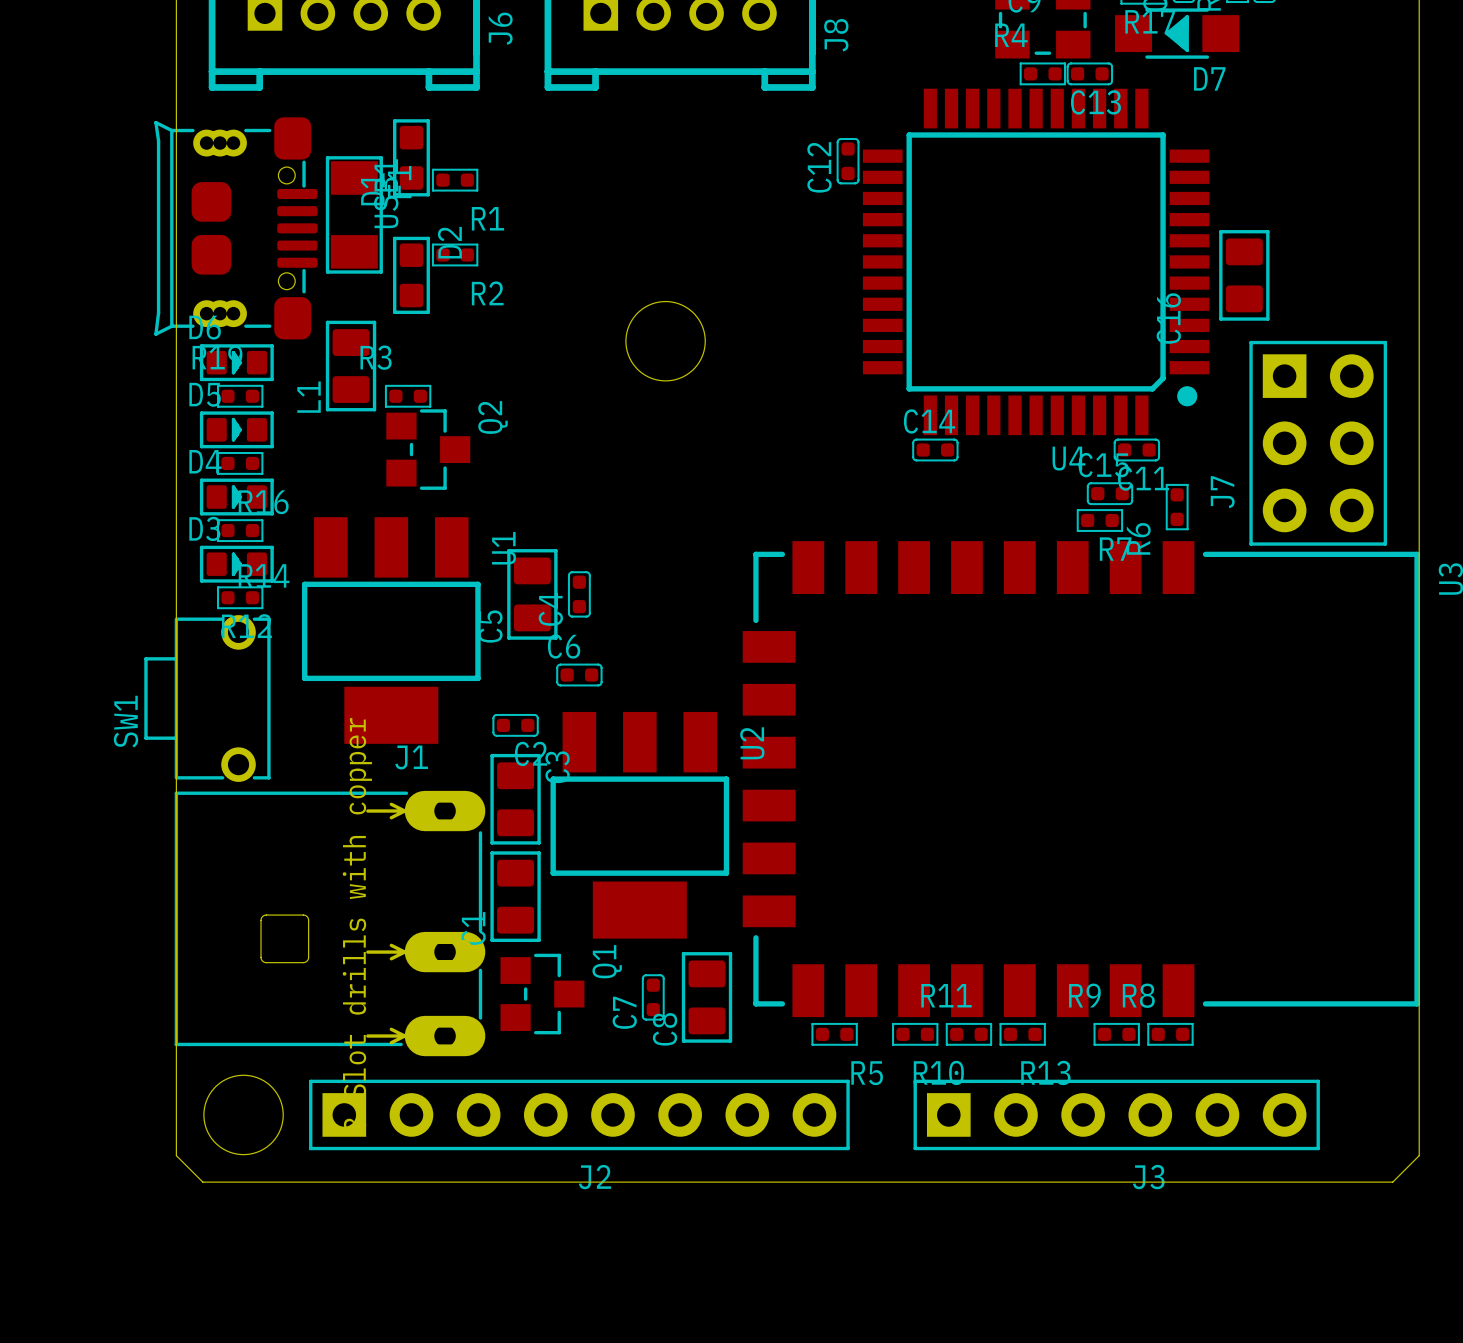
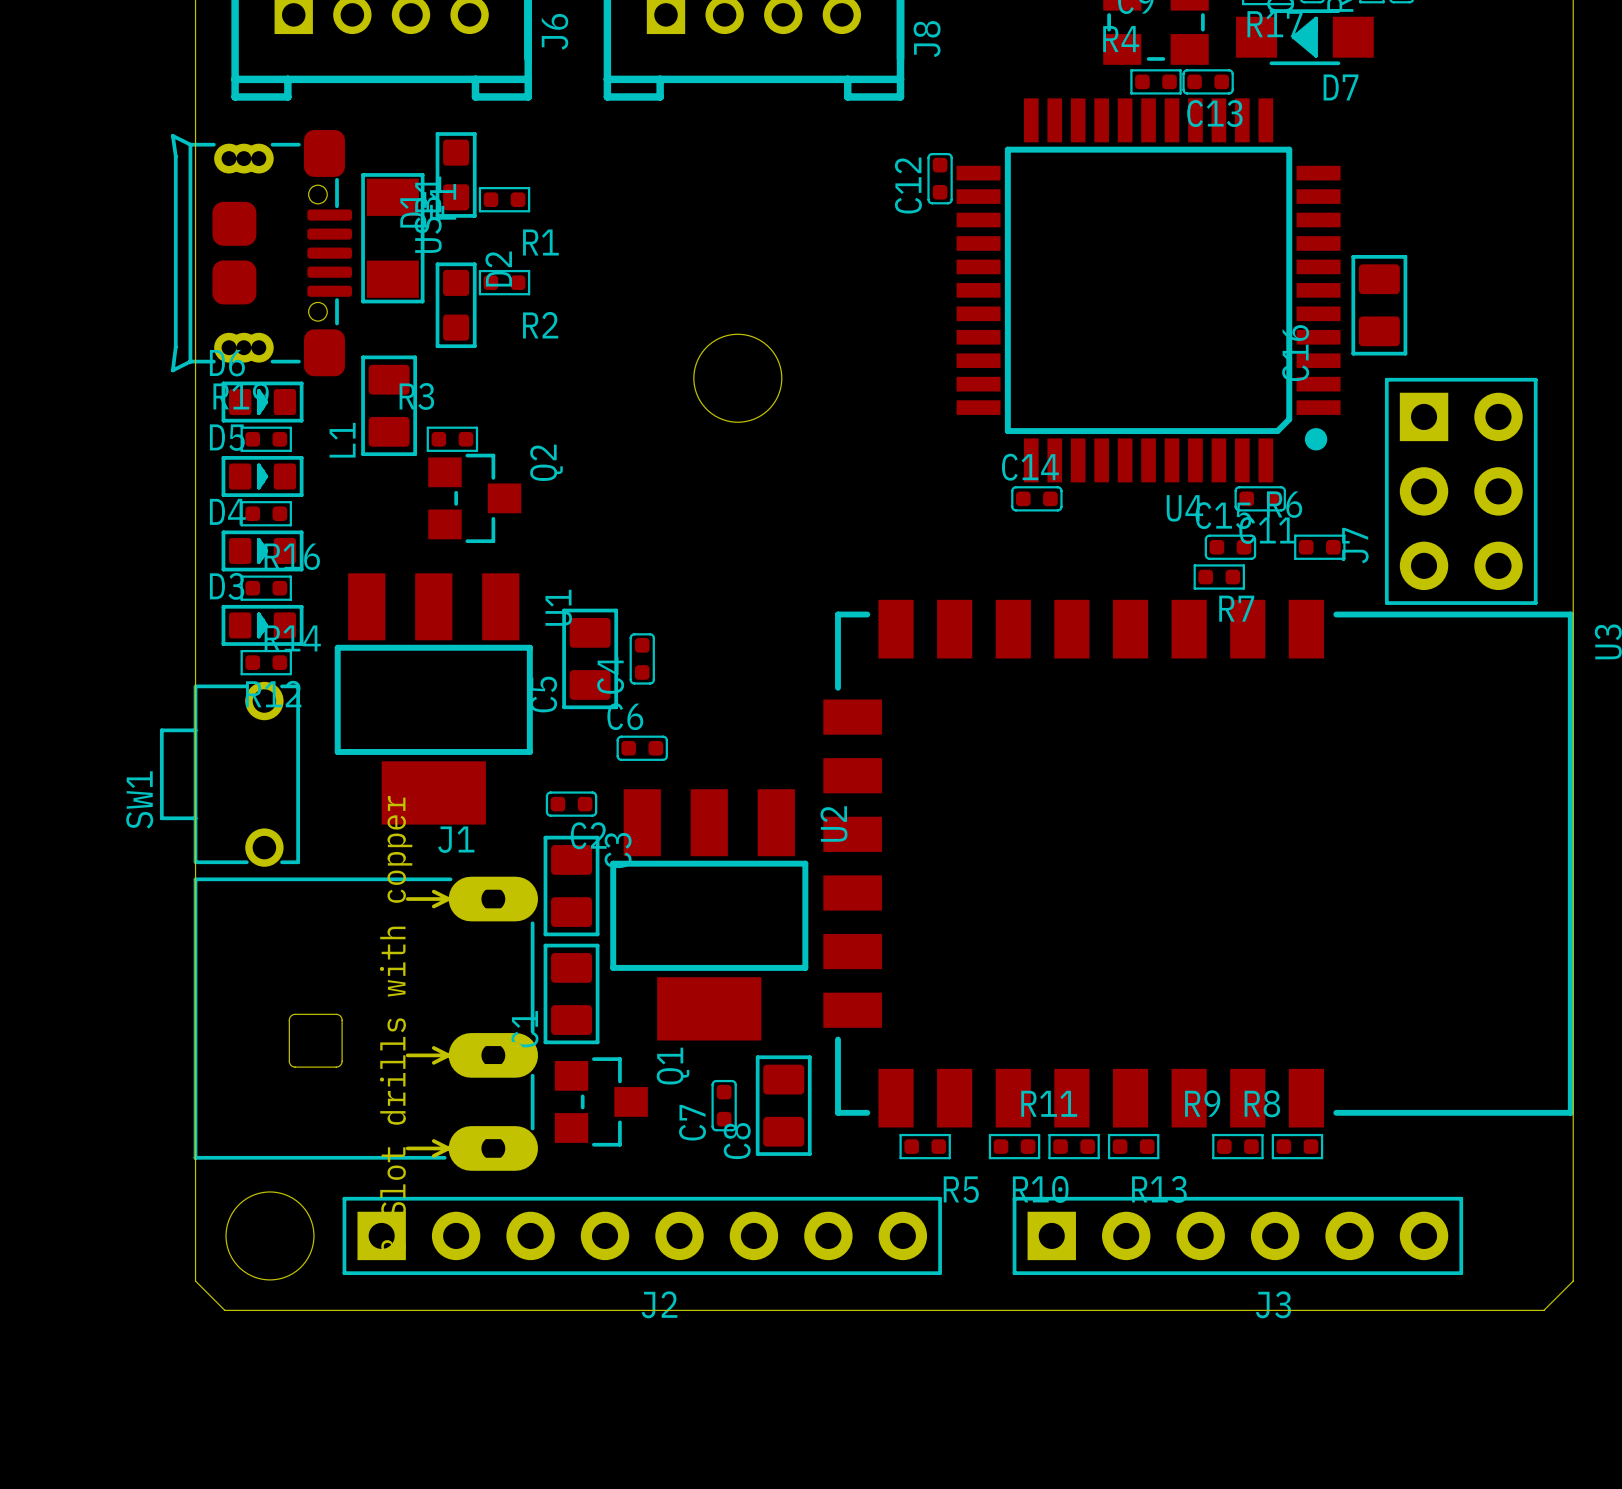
R6 rotation: 0° (1177, 507) -> 90° clockwise (1319, 547)

